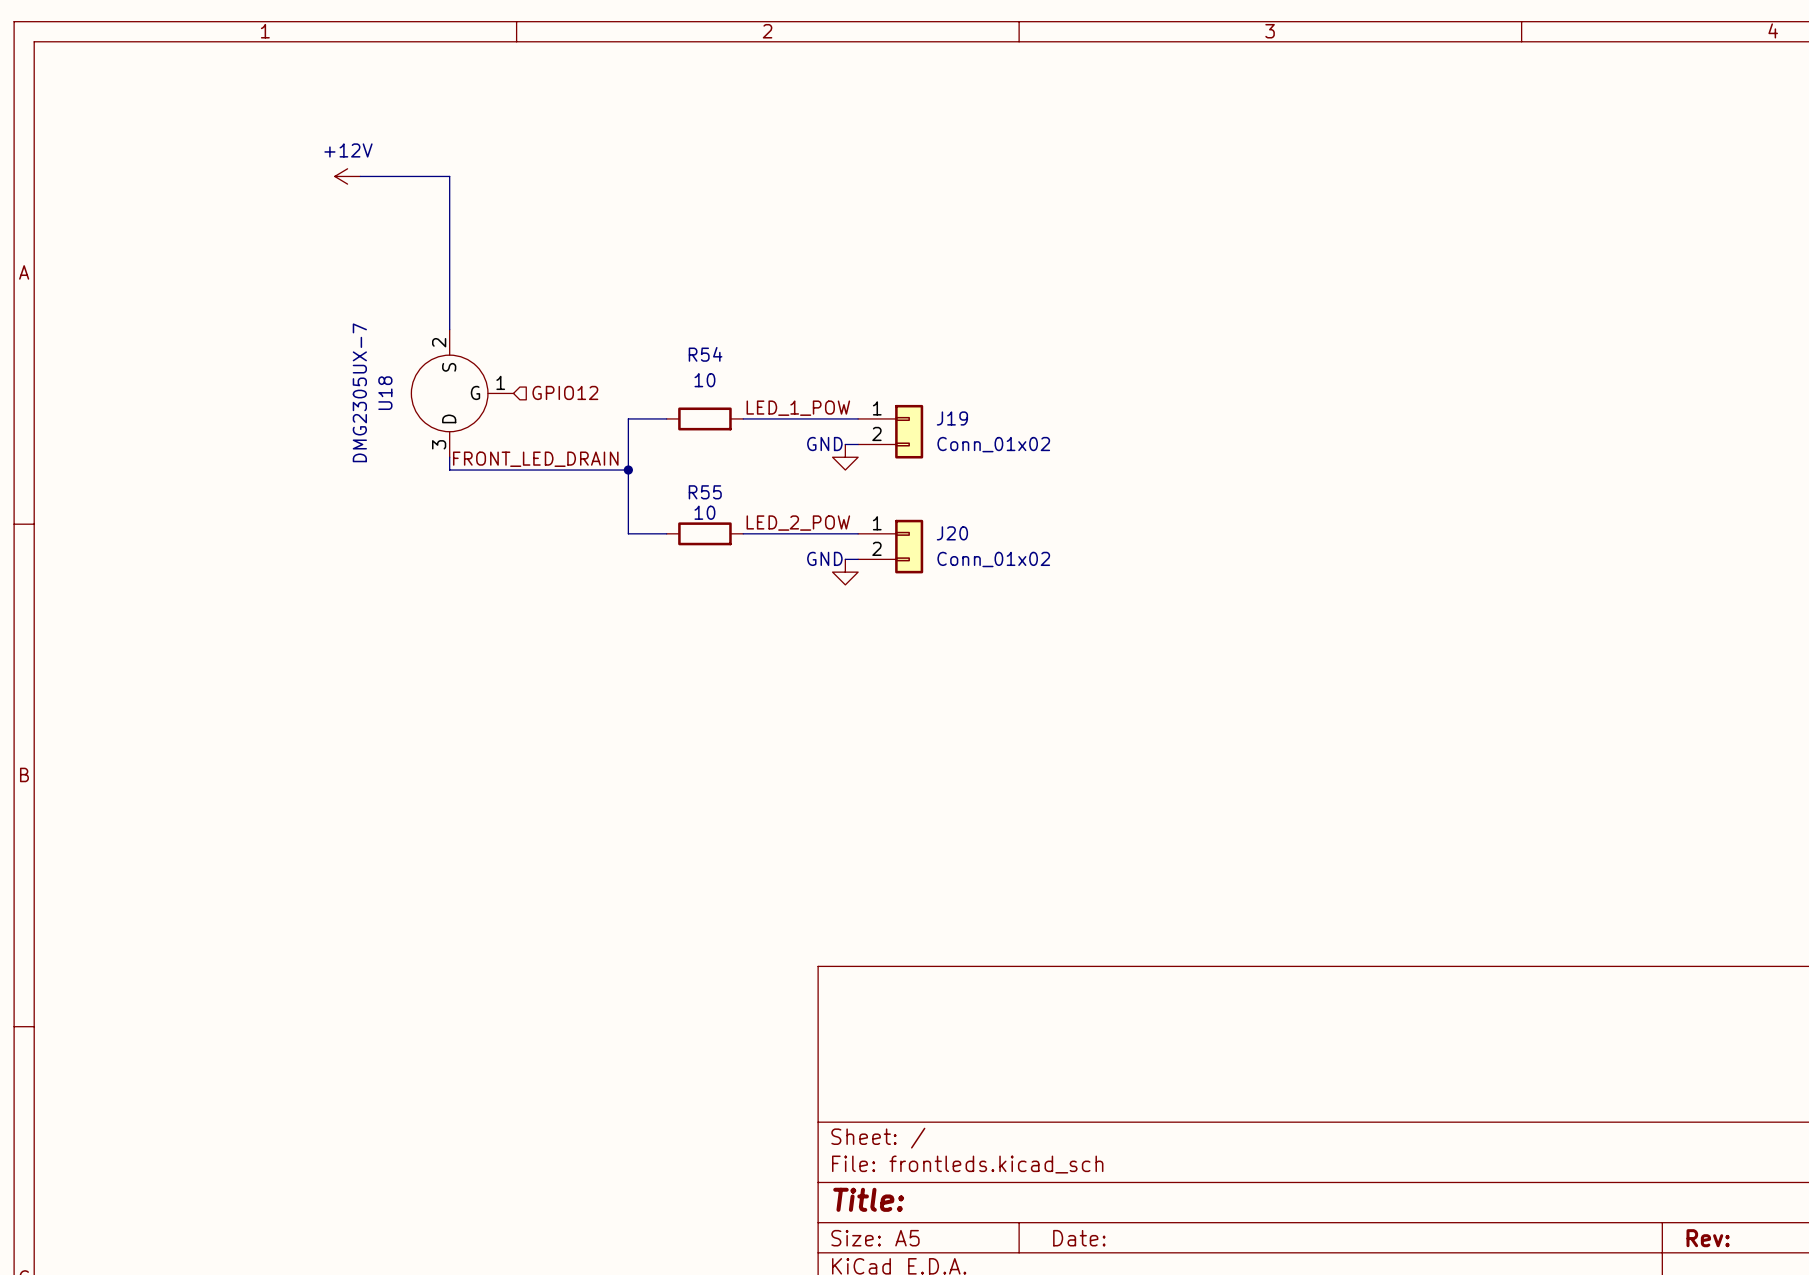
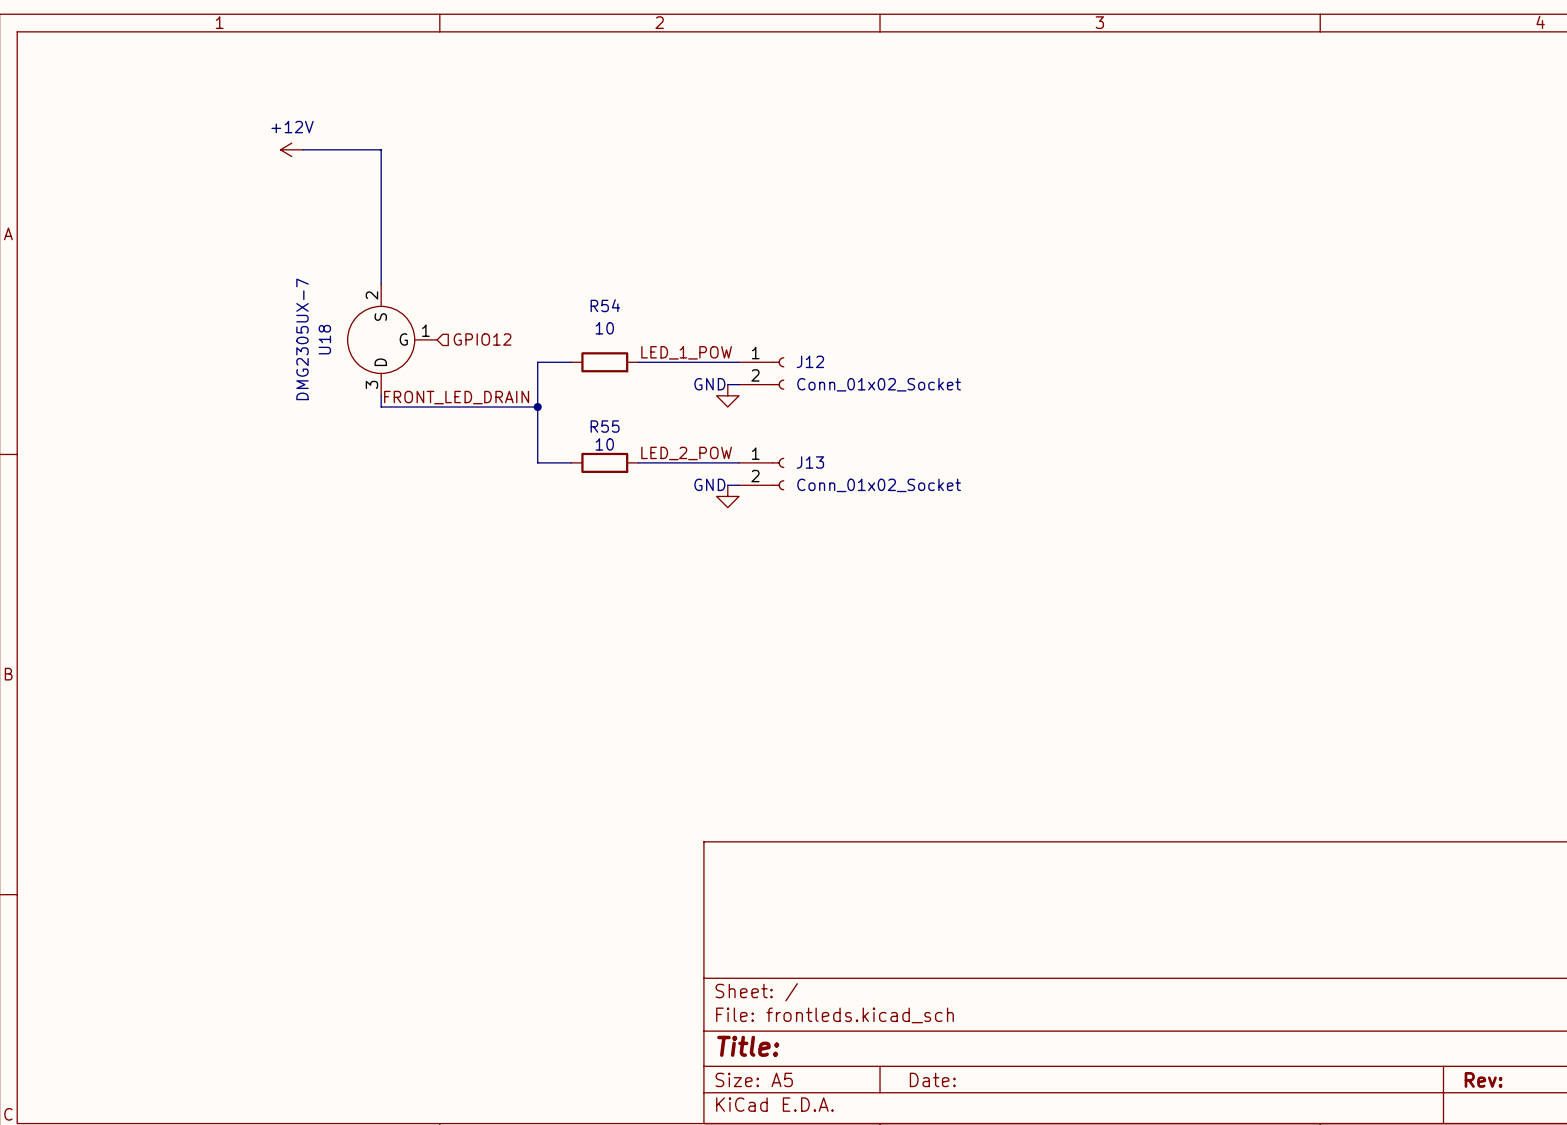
J12: none -> Conn_01x02_Socket (761, 373)
J19: Conn_01x02 (890, 431) -> none
J13: none -> Conn_01x02_Socket (761, 474)
J20: Conn_01x02 (890, 546) -> none

